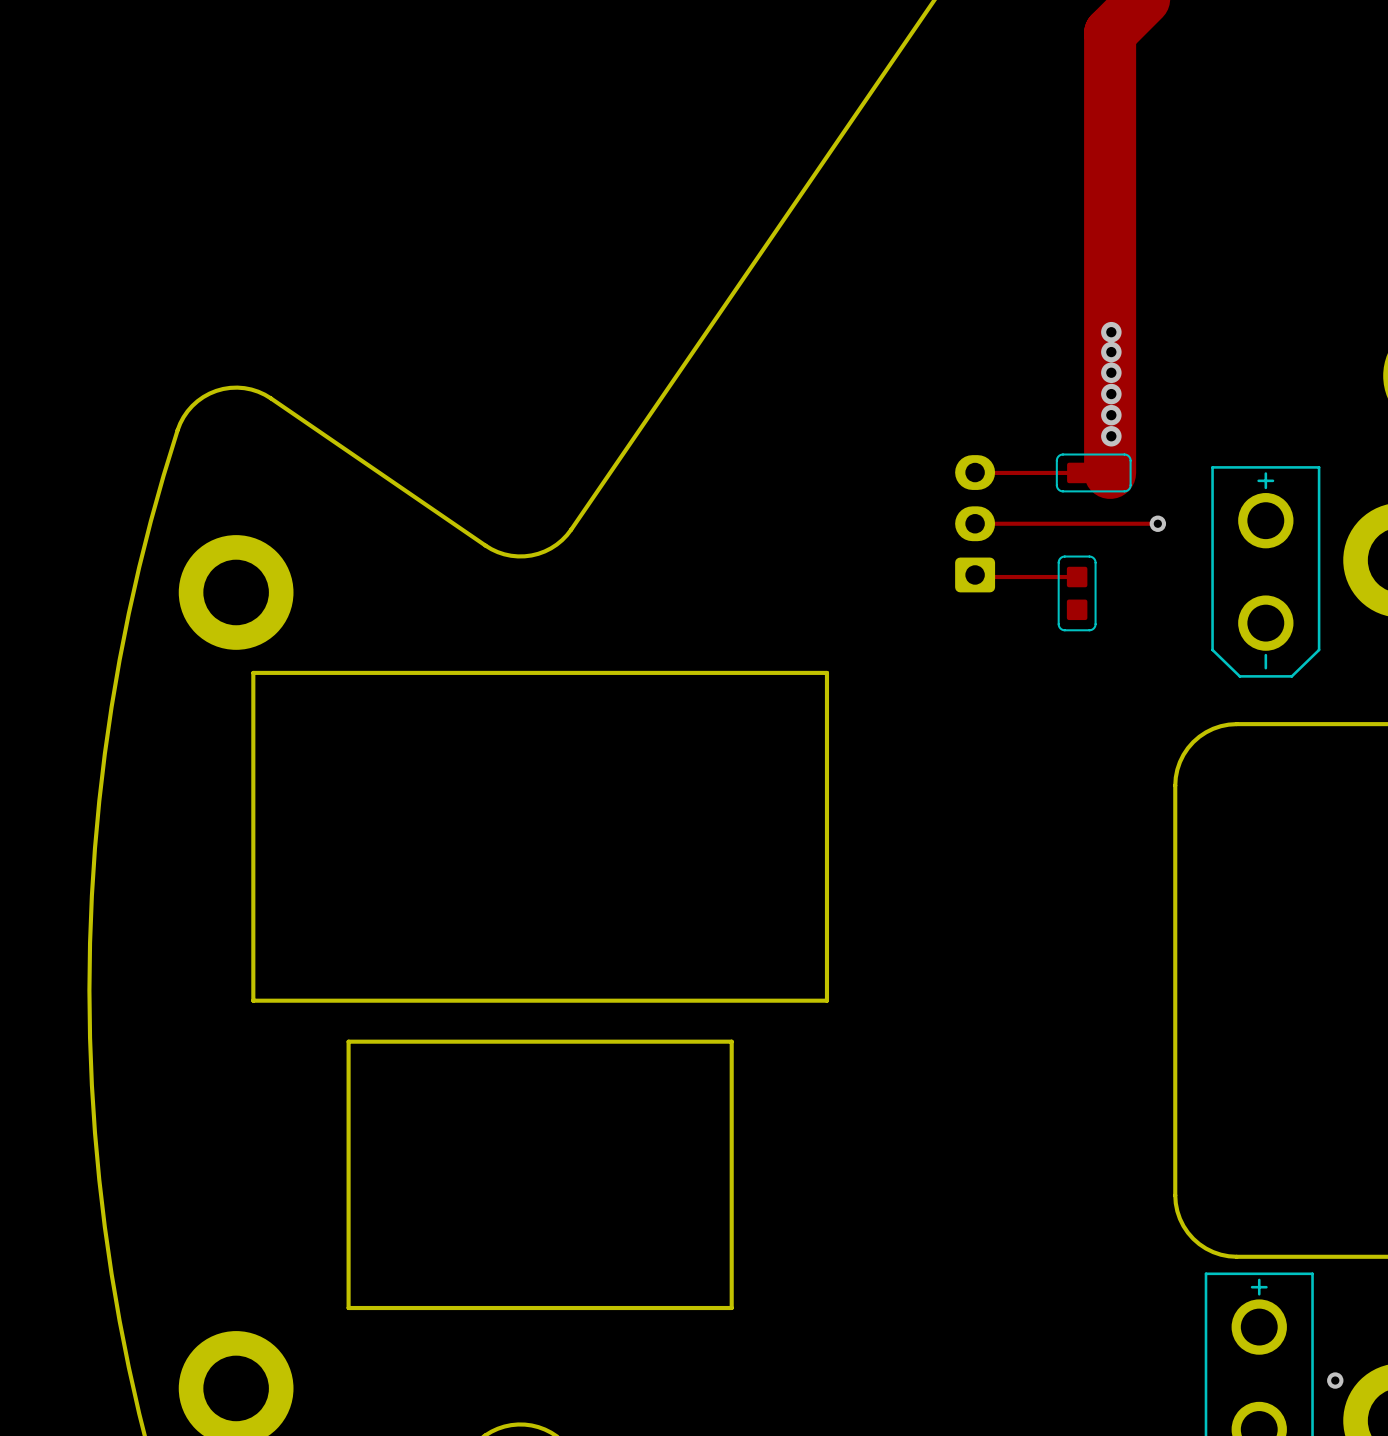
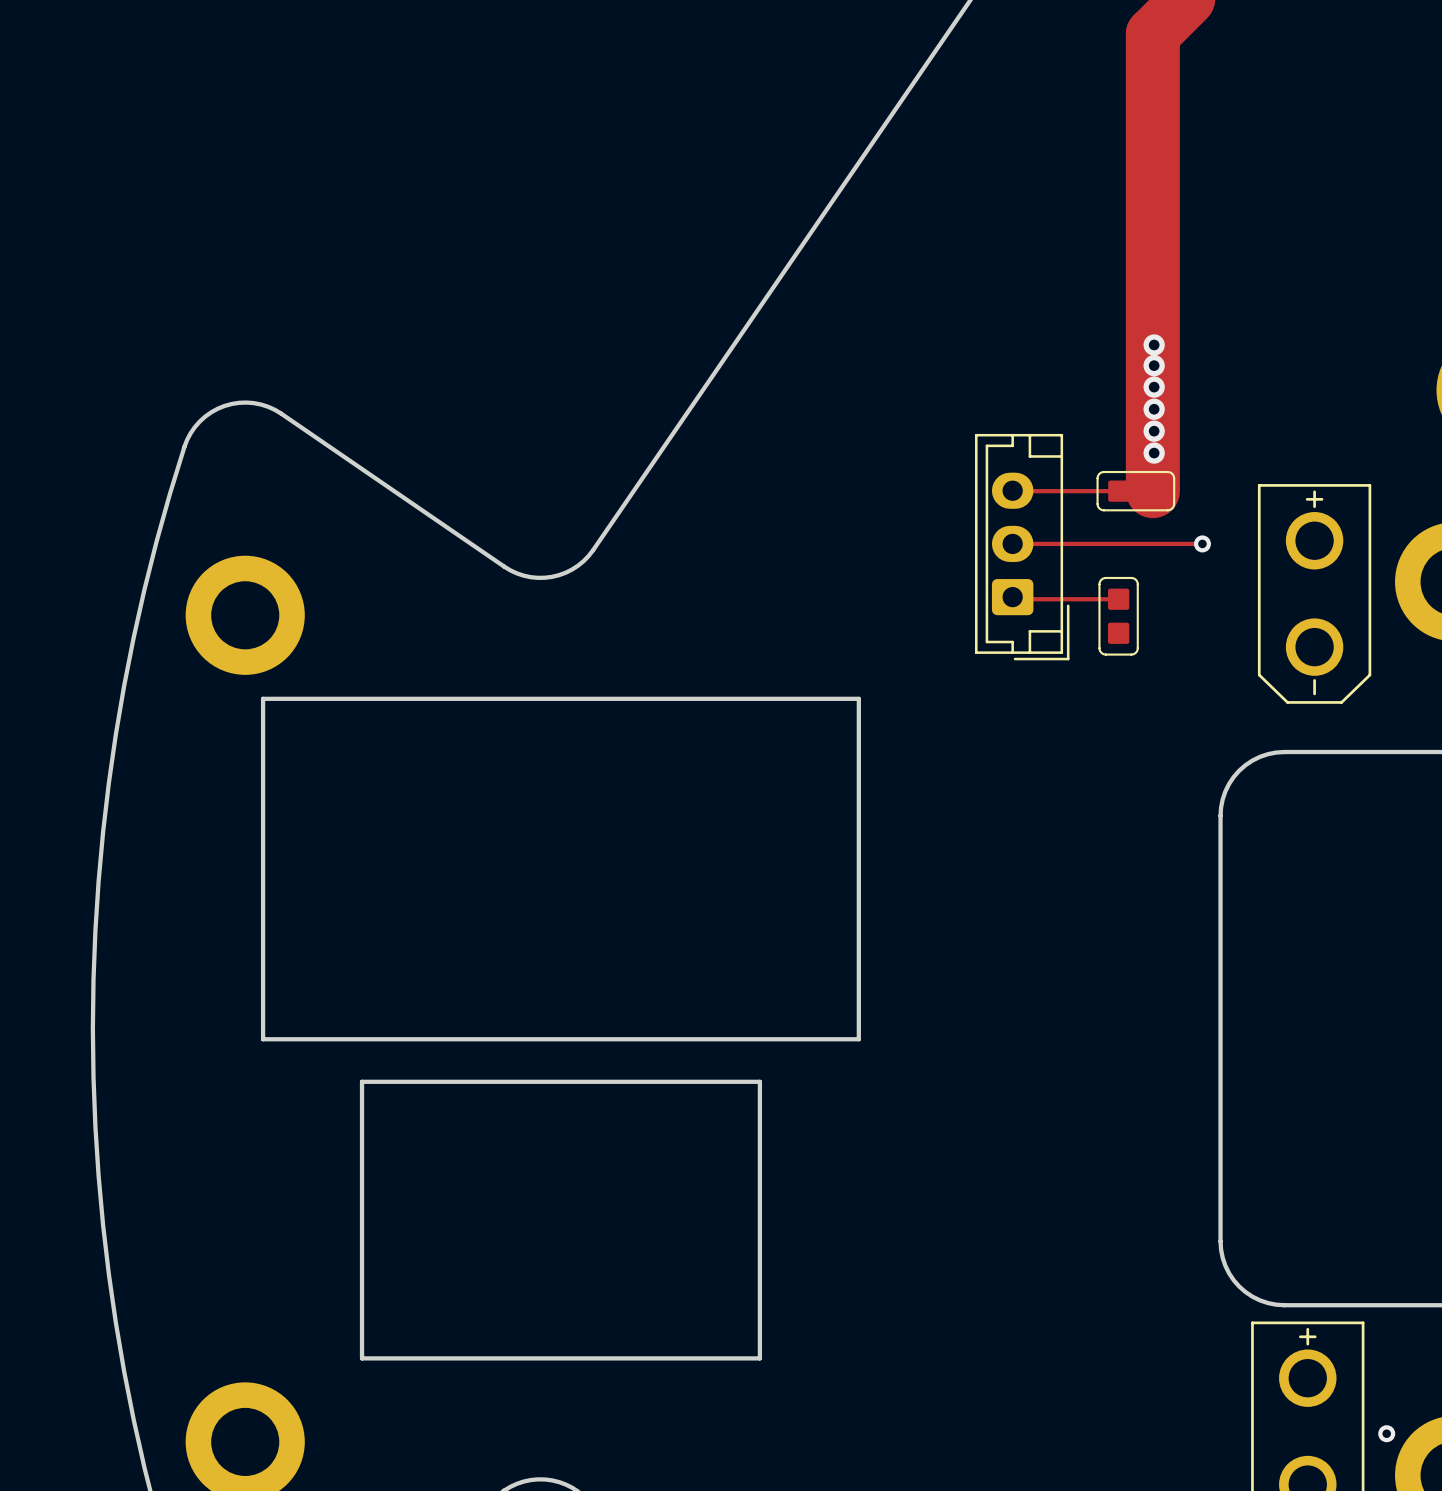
part side: bottom (975, 523) -> top (1022, 547)

